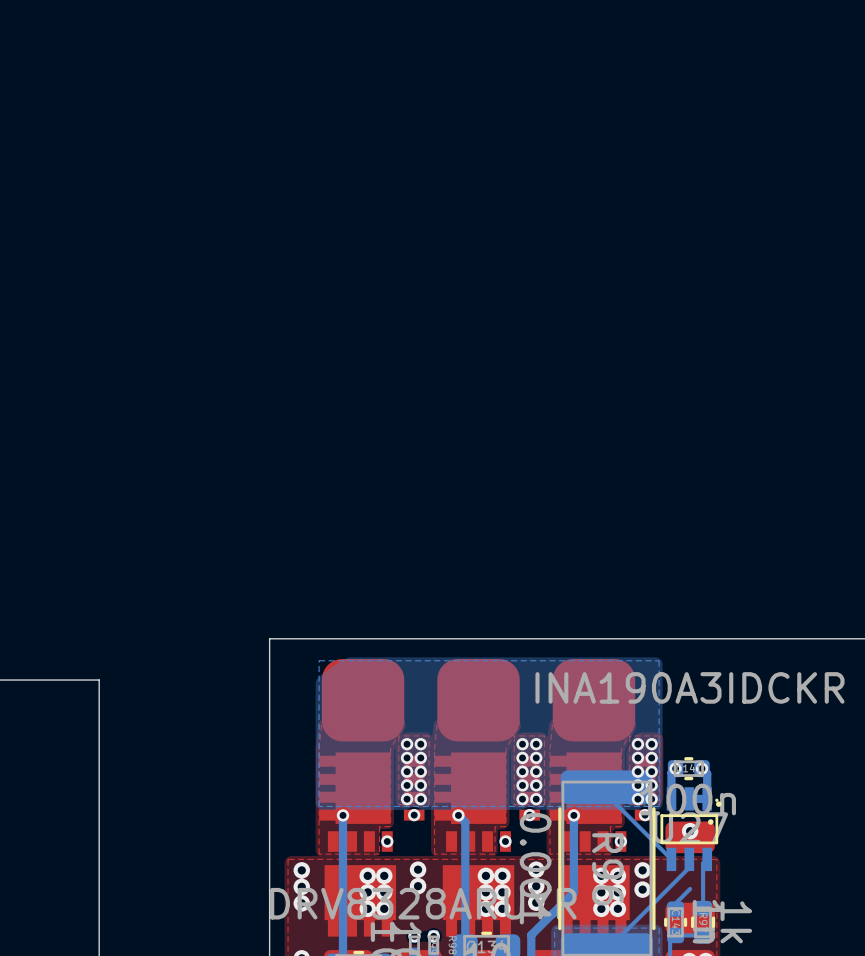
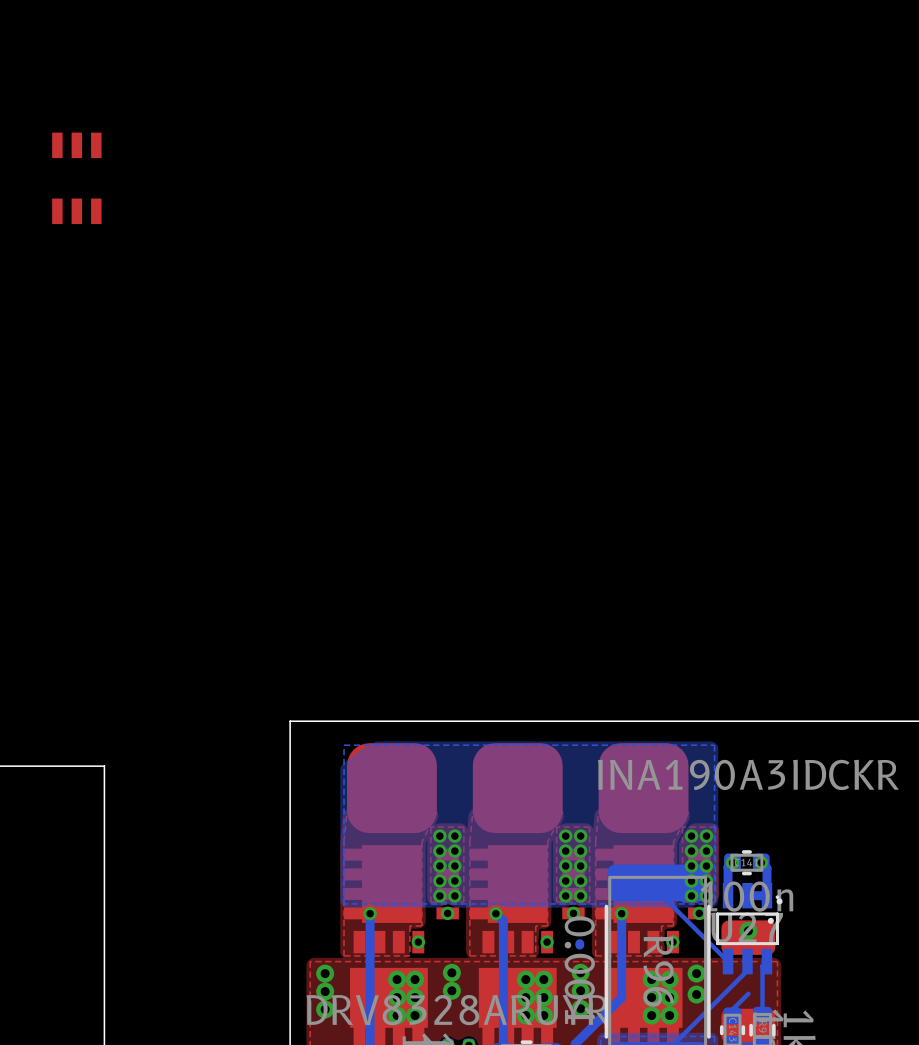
part: none -> (76, 178)
bottom track: none -> (579, 943) (579, 945)

